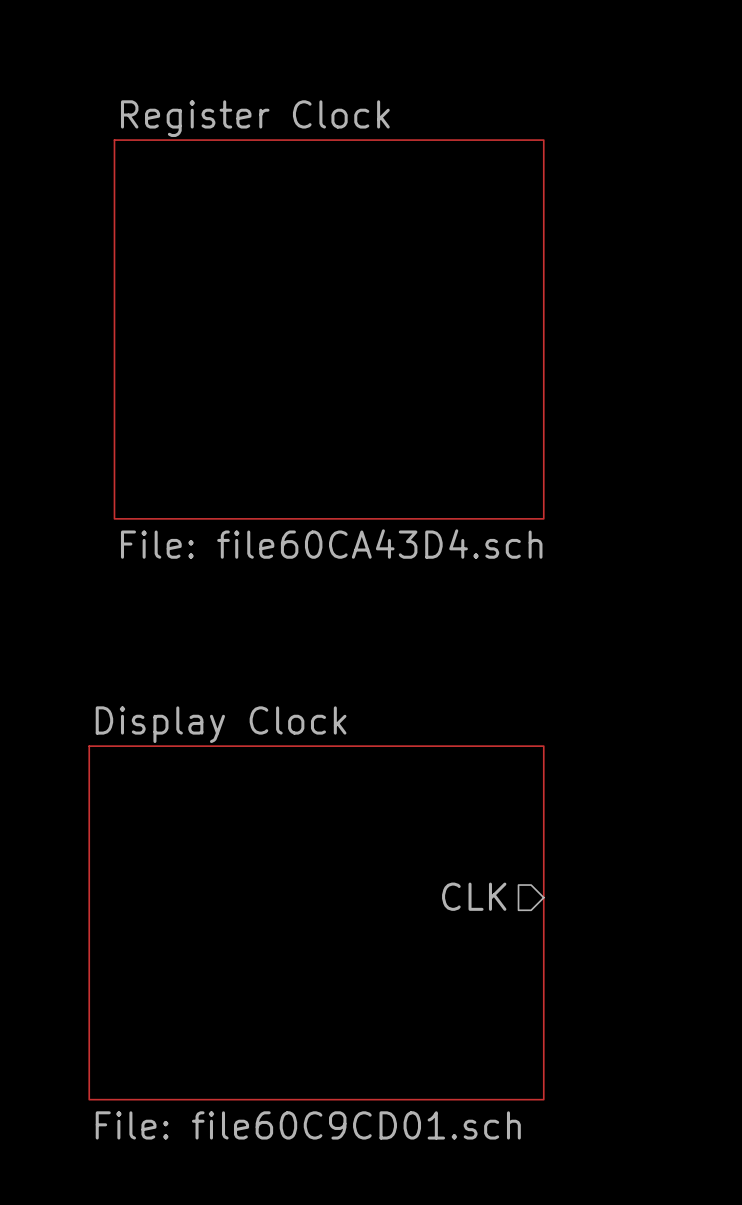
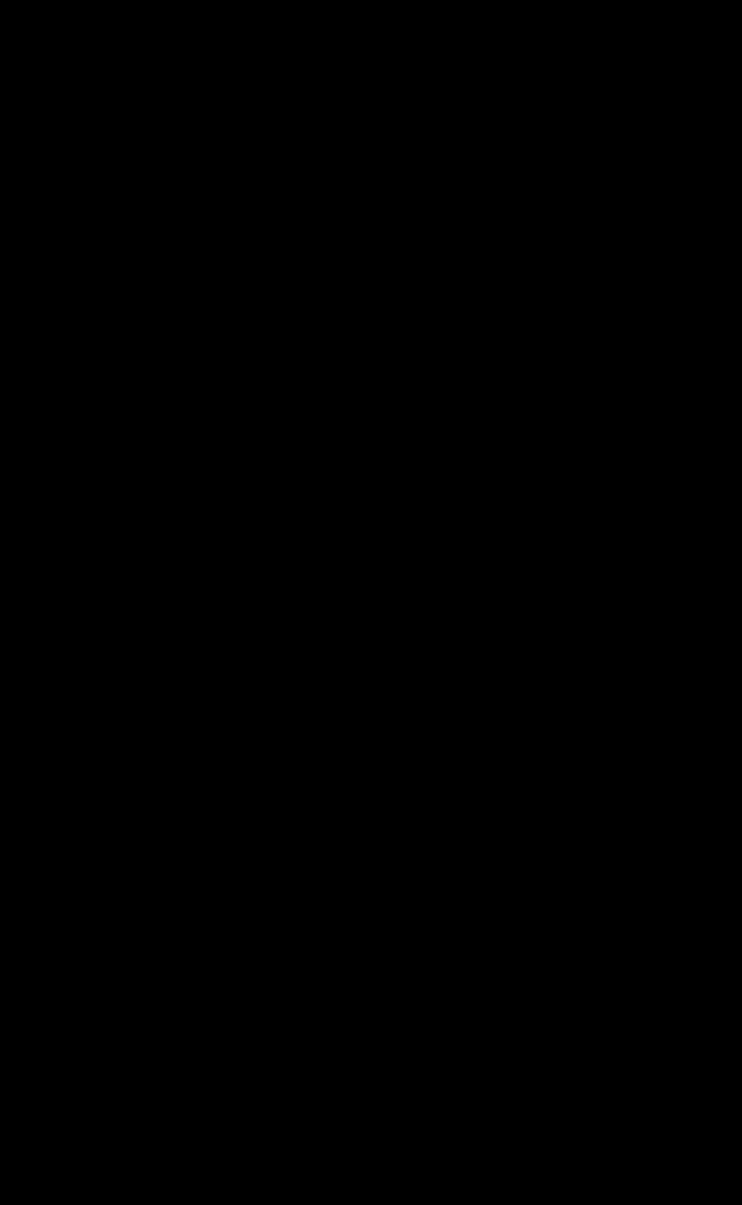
sheet Register Clock: File: file60CA43D4.sch (329, 329) -> none
sheet pin: CLK (474, 896) -> none
sheet Display Clock: File: file60C9CD01.sch (316, 922) -> none

